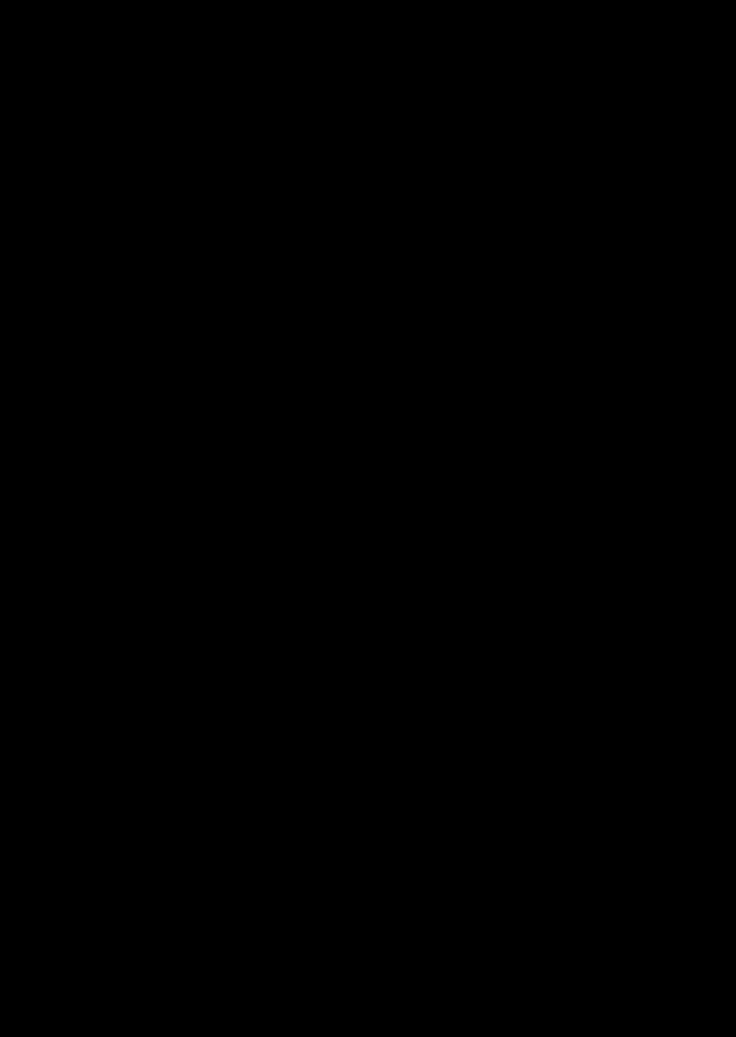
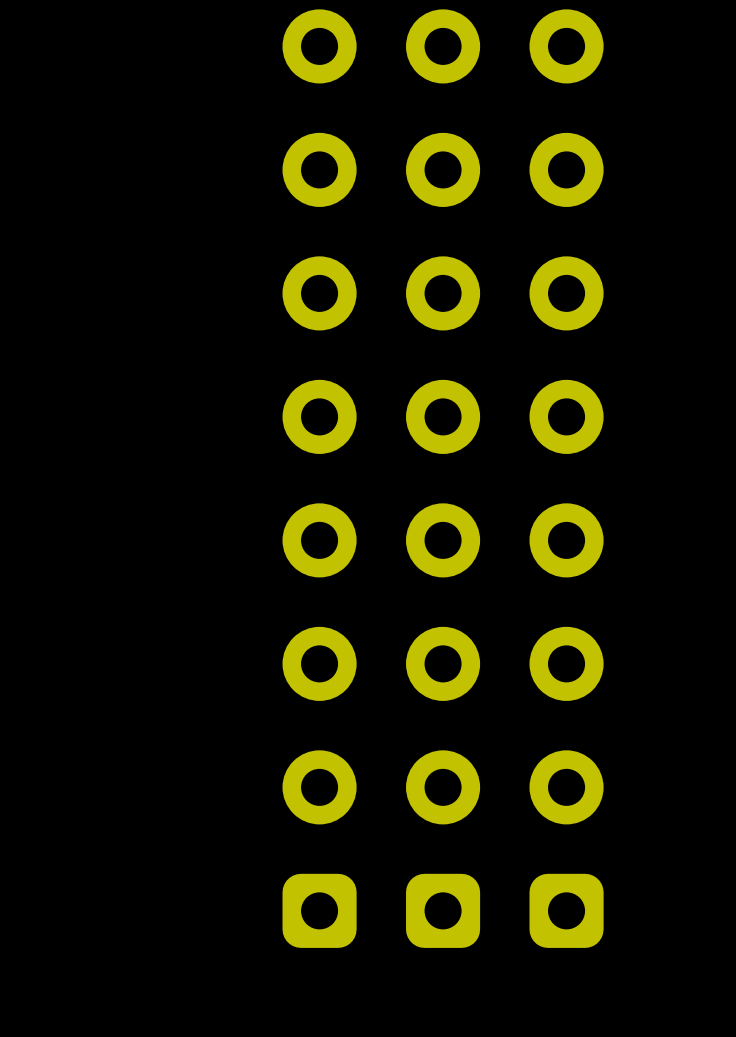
part: none -> (319, 478)
part: none -> (443, 478)
part: none -> (566, 478)

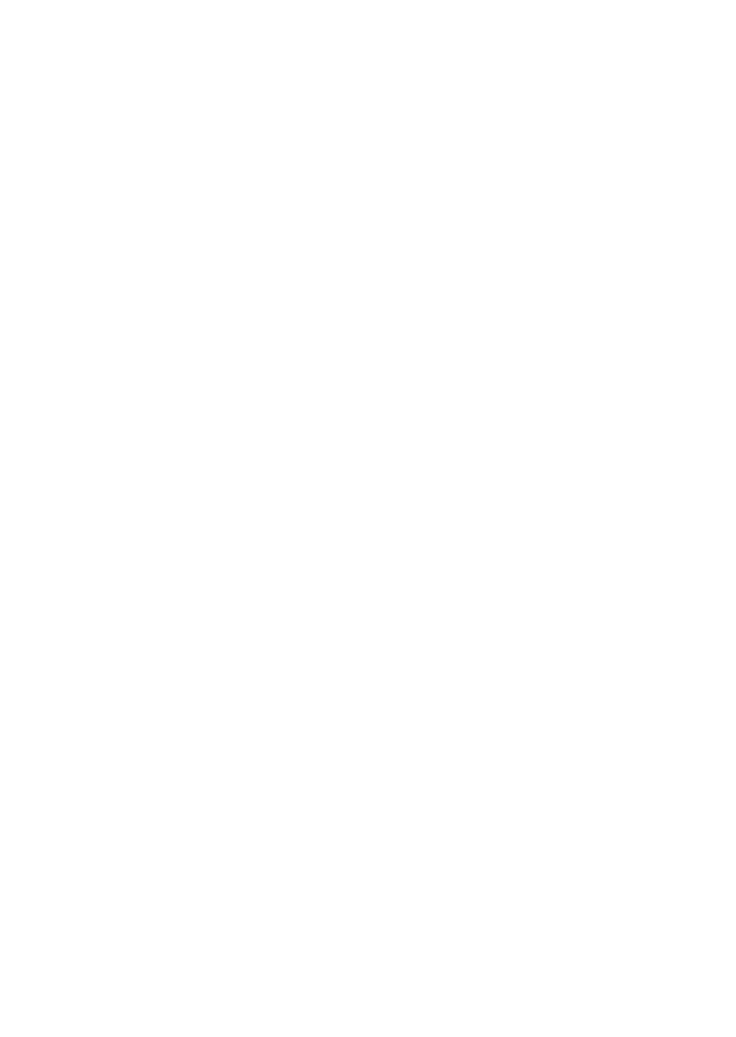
part: (319, 478) -> none
part: (443, 478) -> none
part: (566, 478) -> none

